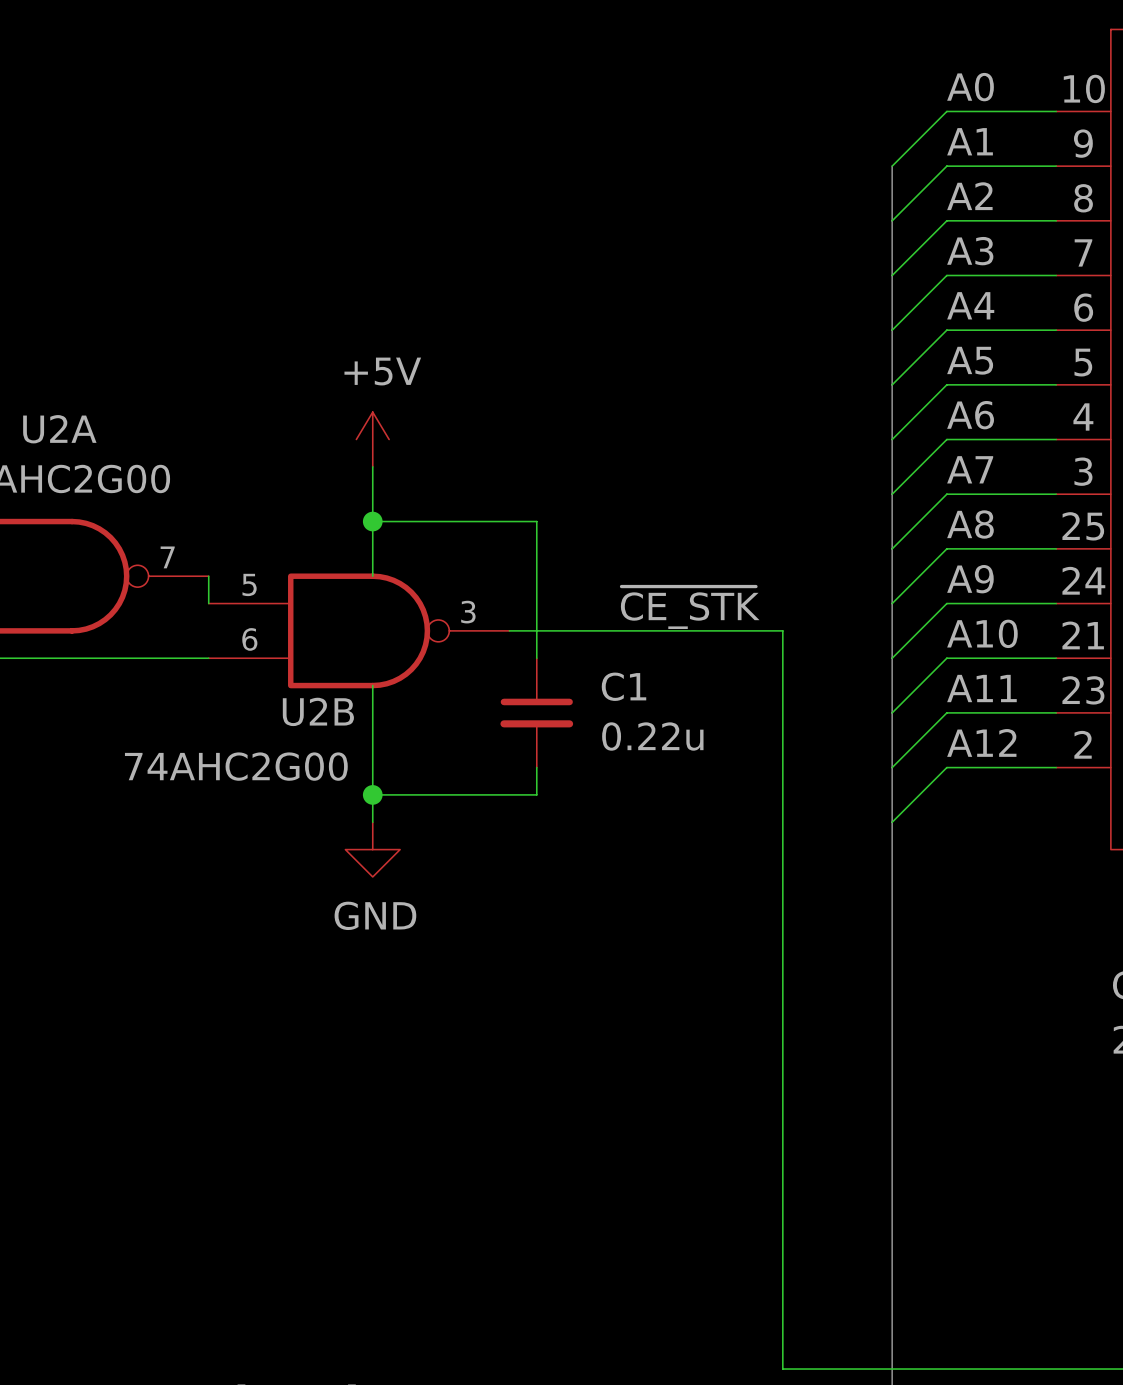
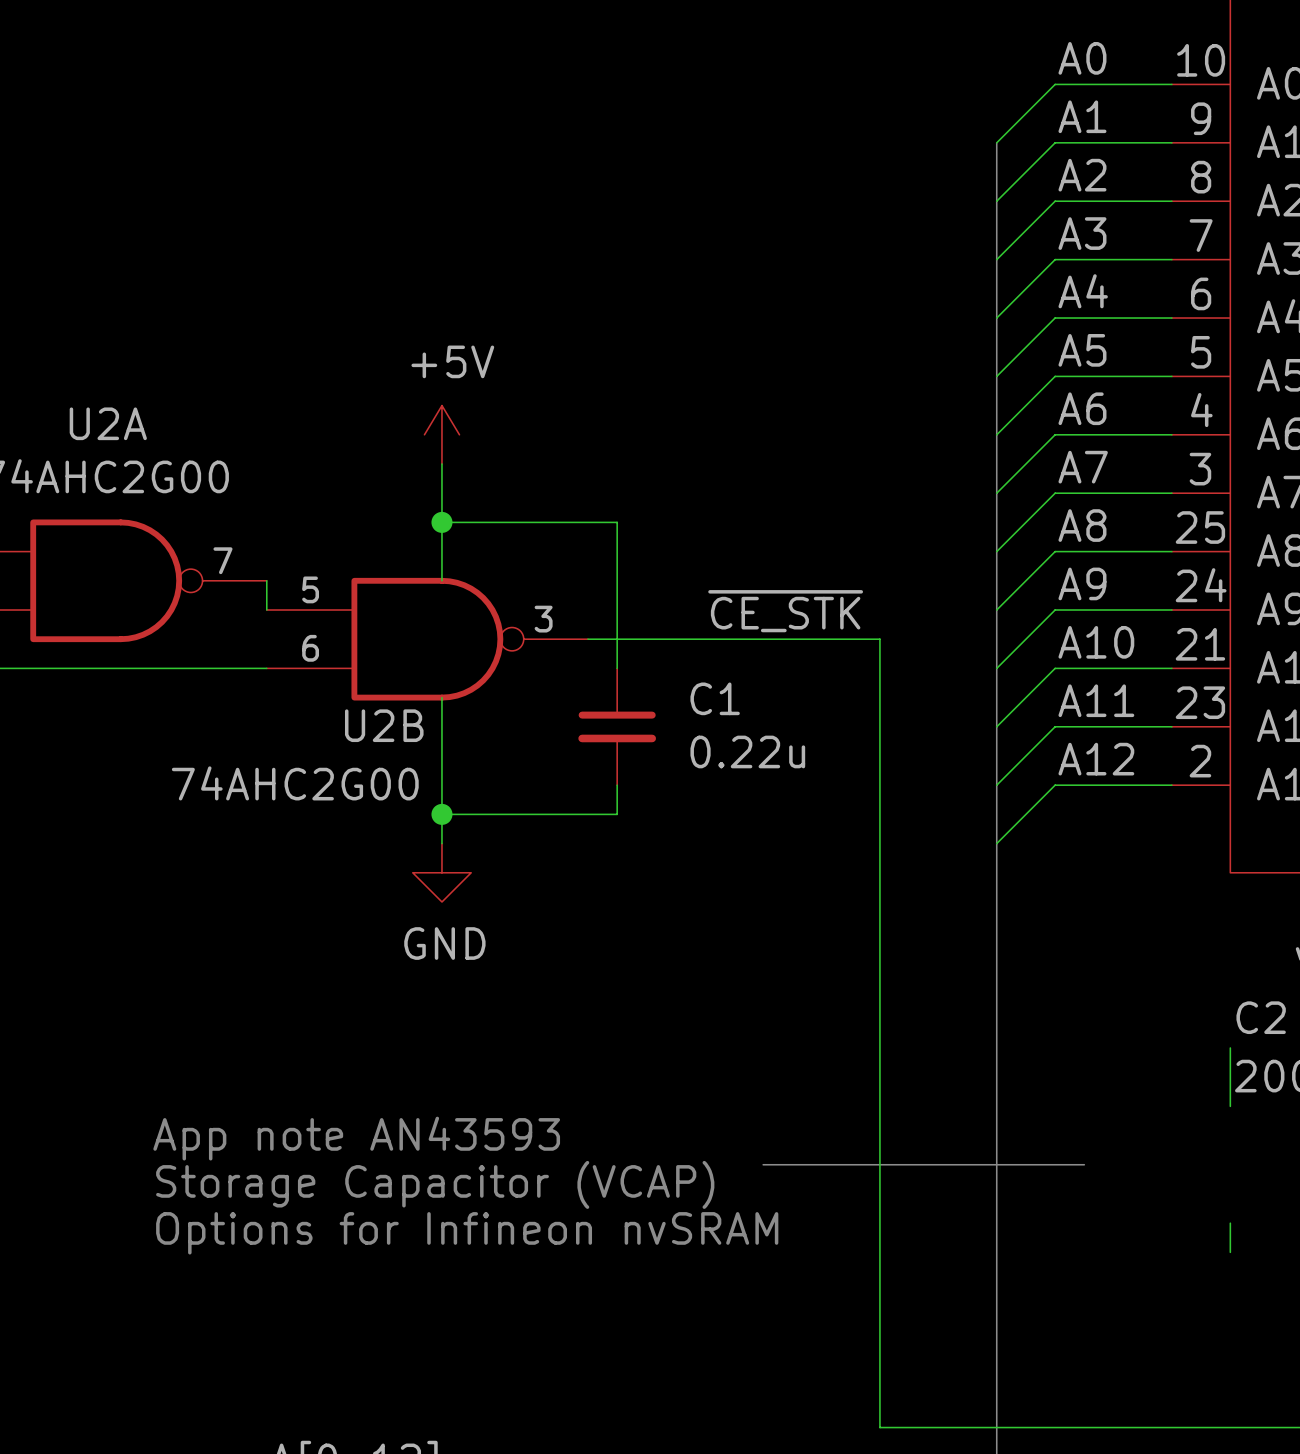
wire: none -> (1230, 1047) (1230, 1106)
text: none -> App note AN43593 (356, 1138)
line: none -> (763, 1164) (1084, 1164)
text: none -> Storage Capacitor (VCAP) (435, 1184)
wire: none -> (1230, 1223) (1230, 1252)
text: none -> Options for Infineon nvSRAM (467, 1233)

